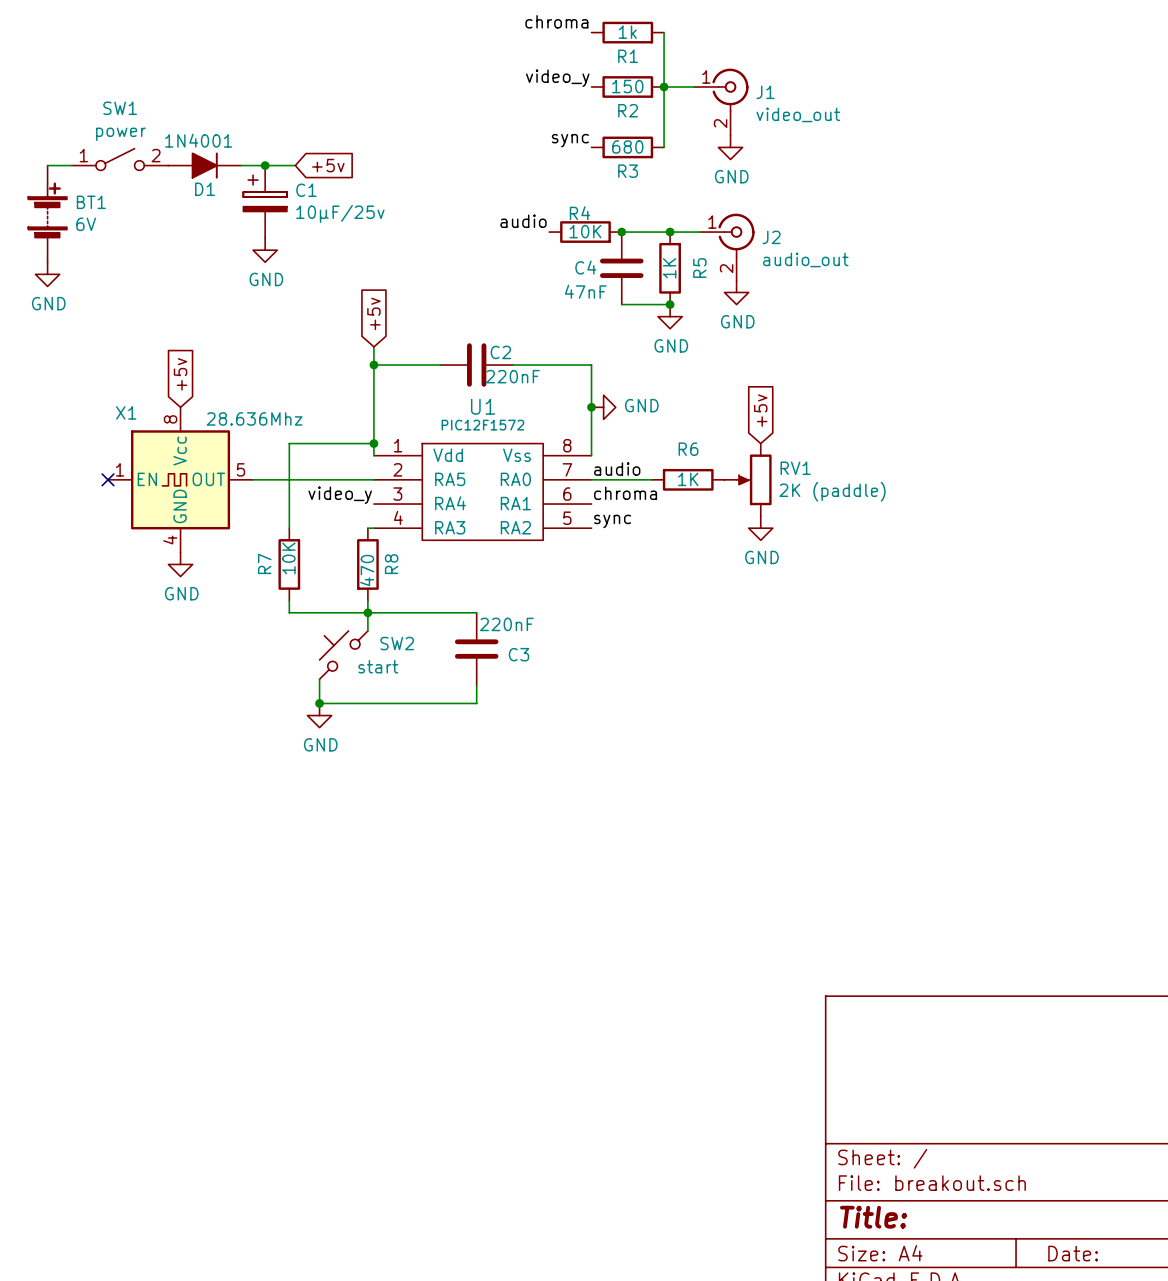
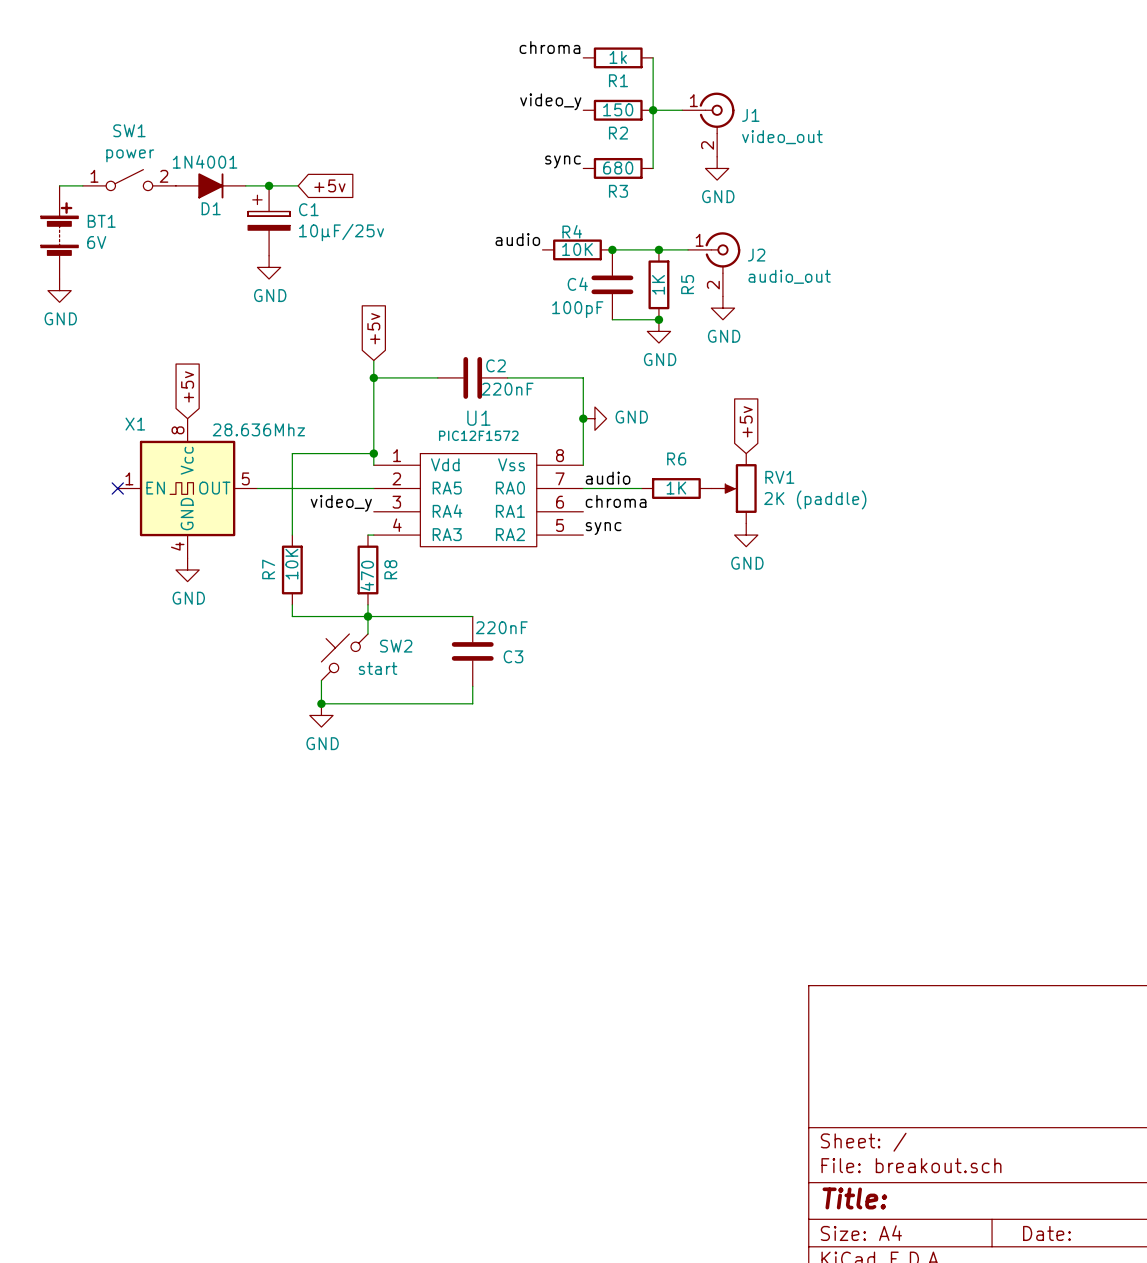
C4 value: 47nF (585, 291) -> 100pF (577, 309)

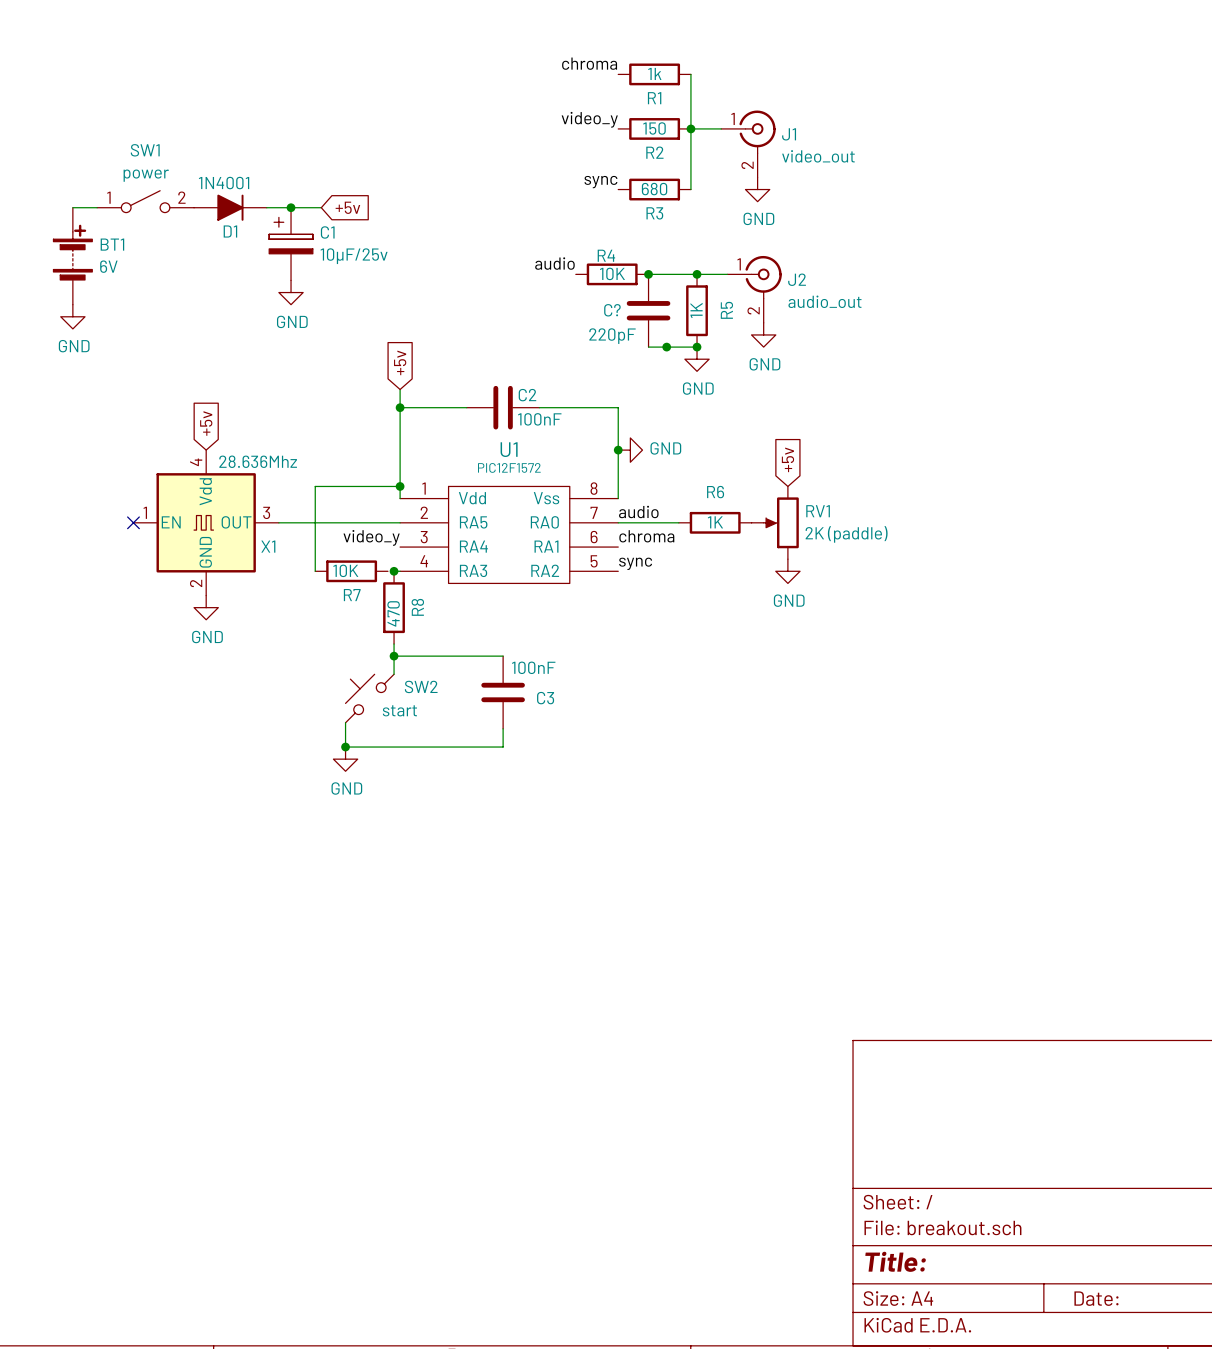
C4 name: C4 (577, 284) -> C? (612, 310)
C4 value: 100pF (577, 309) -> 220pF (612, 336)
junction: none -> (666, 347)
C2 value: 220nF (507, 389) -> 100nF (539, 419)
X1 symbol: [117, 418, 258, 559] -> [133, 450, 279, 596]
X1 name position: X1 (135, 424) -> X1 (268, 546)
junction: none -> (394, 571)
R7 name position: R7 (268, 569) -> R7 (352, 595)
R7 rotation: 0° (292, 569) -> 90° clockwise (351, 571)
R7 position: (292, 569) -> (351, 571)
wire: (292, 604) (292, 616) (367, 616) -> none
C3 value: 220nF (501, 627) -> 100nF (533, 667)

